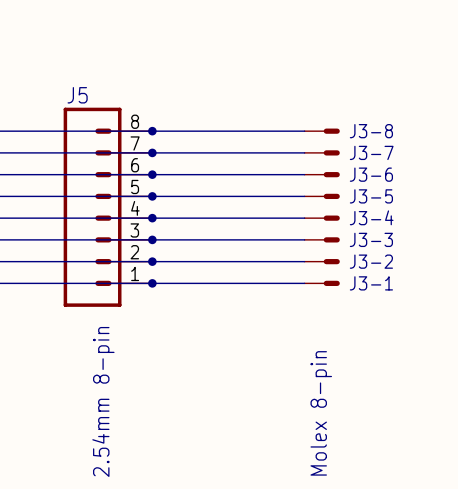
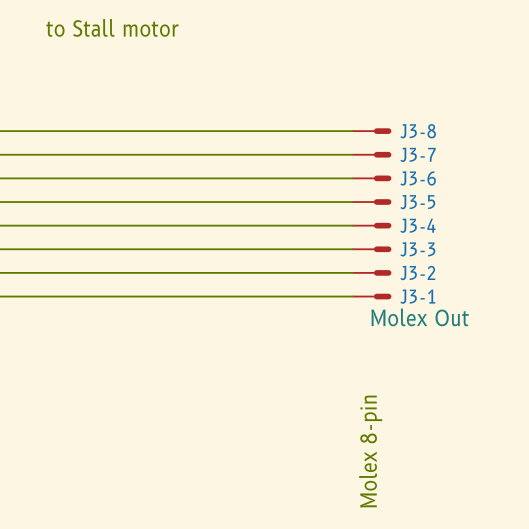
text: none -> to Stall motor (112, 27)
junction: (152, 131) -> none
junction: (152, 152) -> none
junction: (152, 174) -> none
junction: (152, 196) -> none
J5: (108, 207) -> none
junction: (152, 218) -> none
junction: (152, 239) -> none
junction: (152, 261) -> none
junction: (152, 283) -> none
J3-1 value: none -> Molex Out (420, 317)
text: 2.54mm 8-pin (103, 401) -> none

